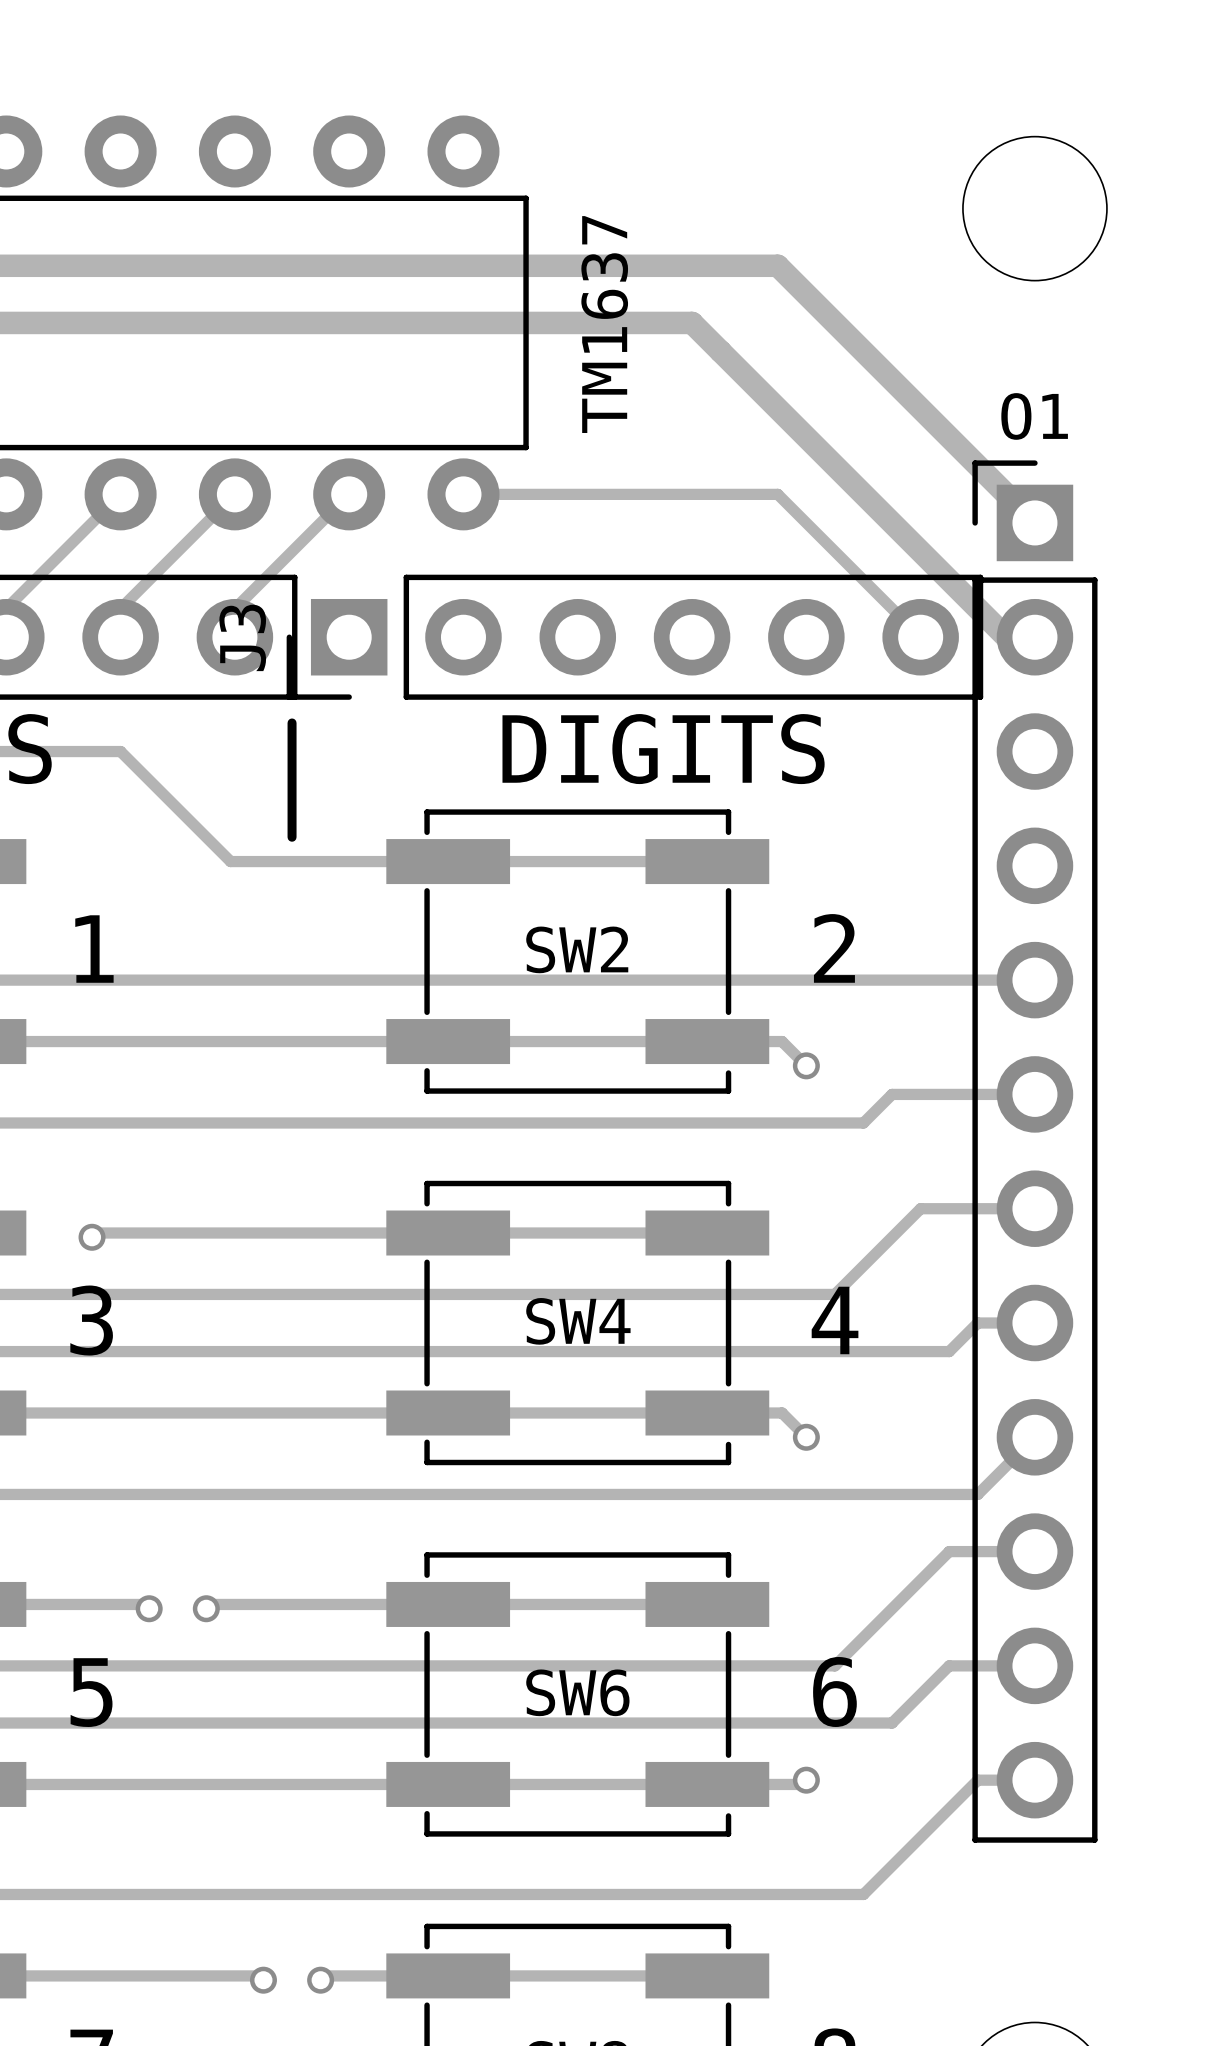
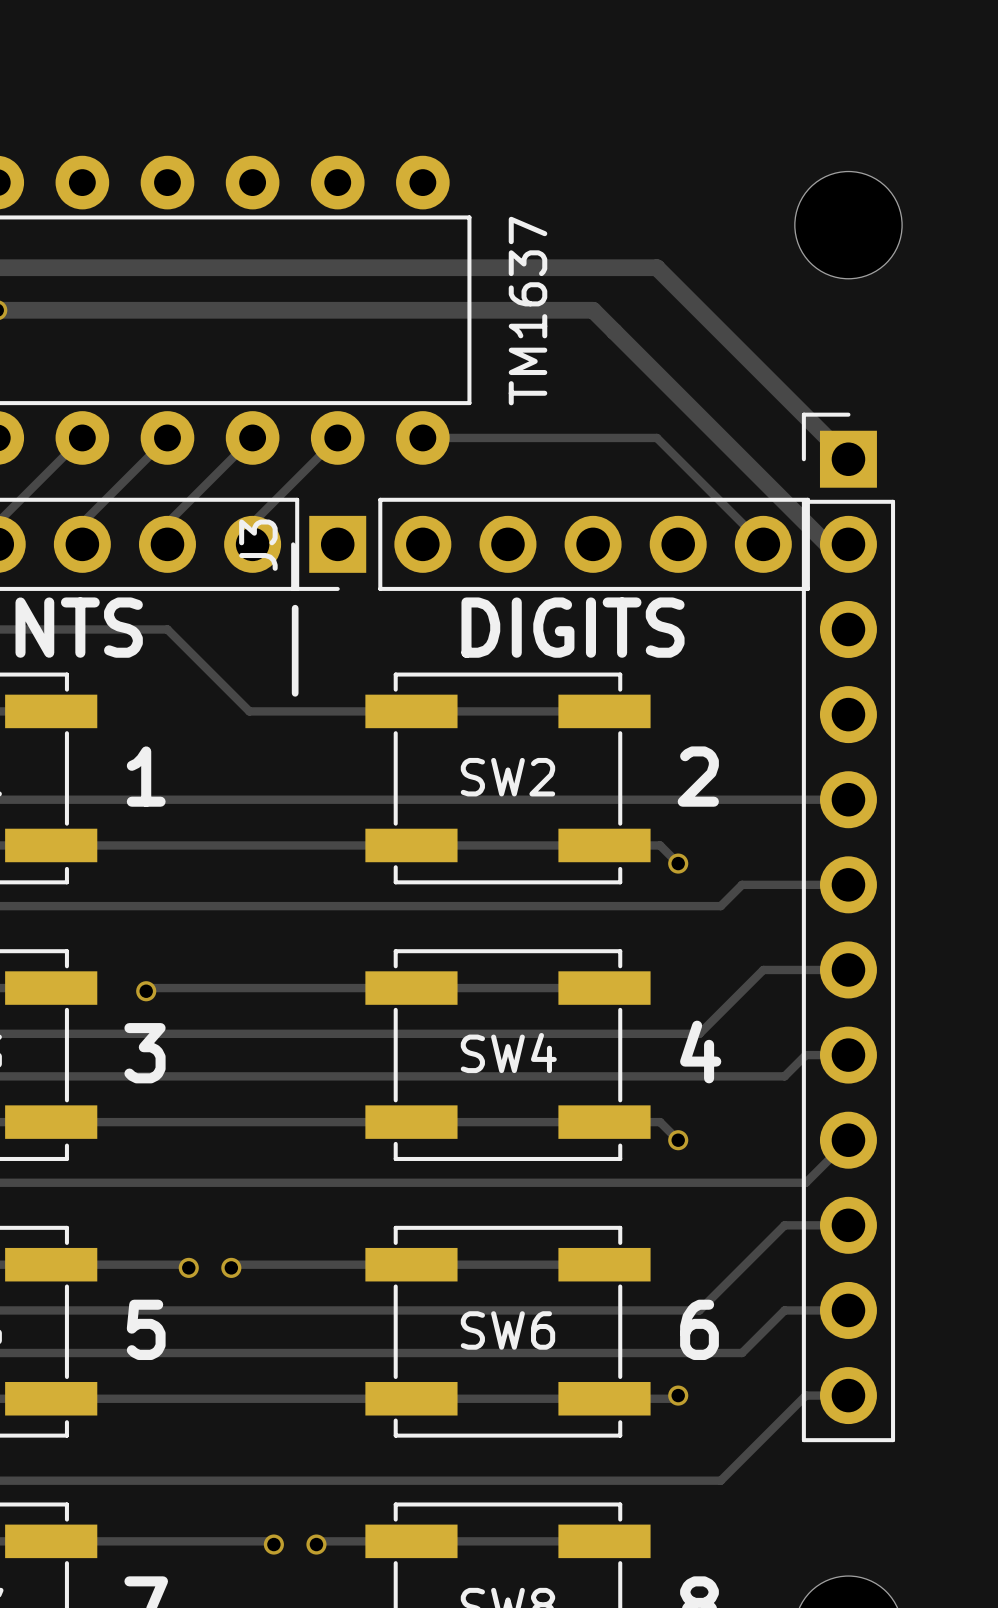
O1 name: O1 (1034, 416) -> none

